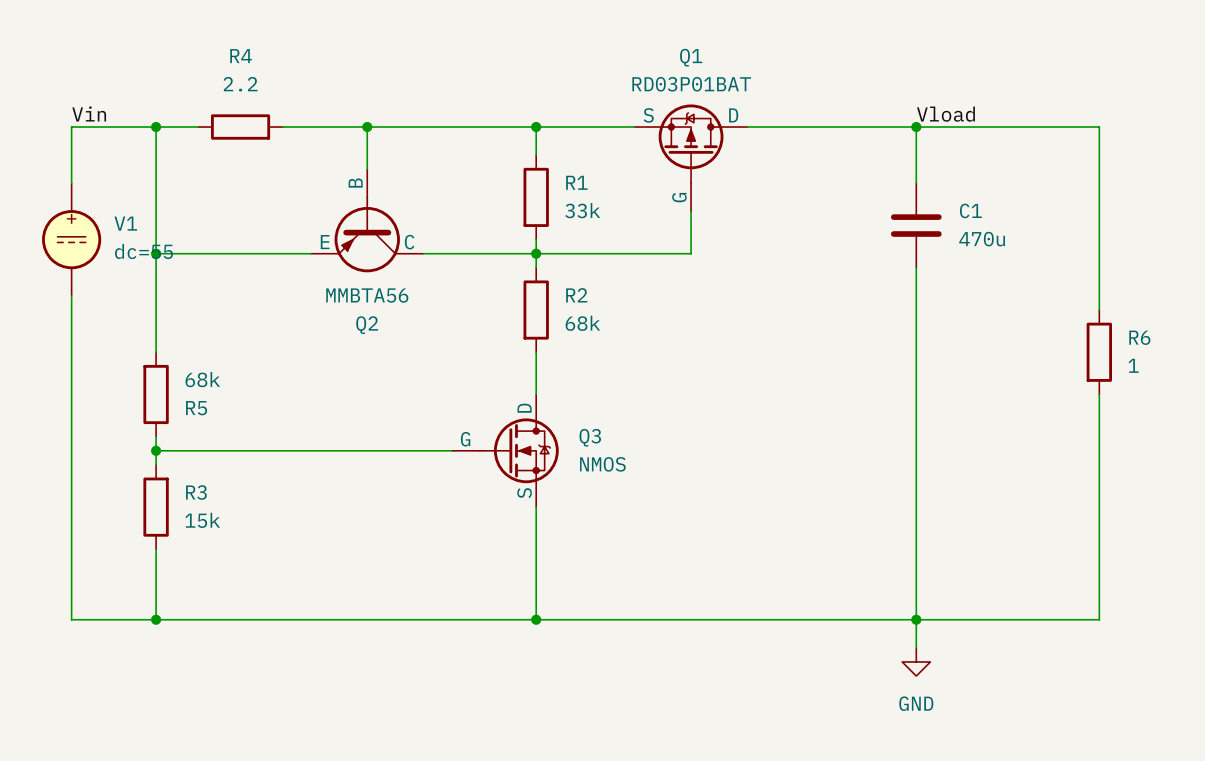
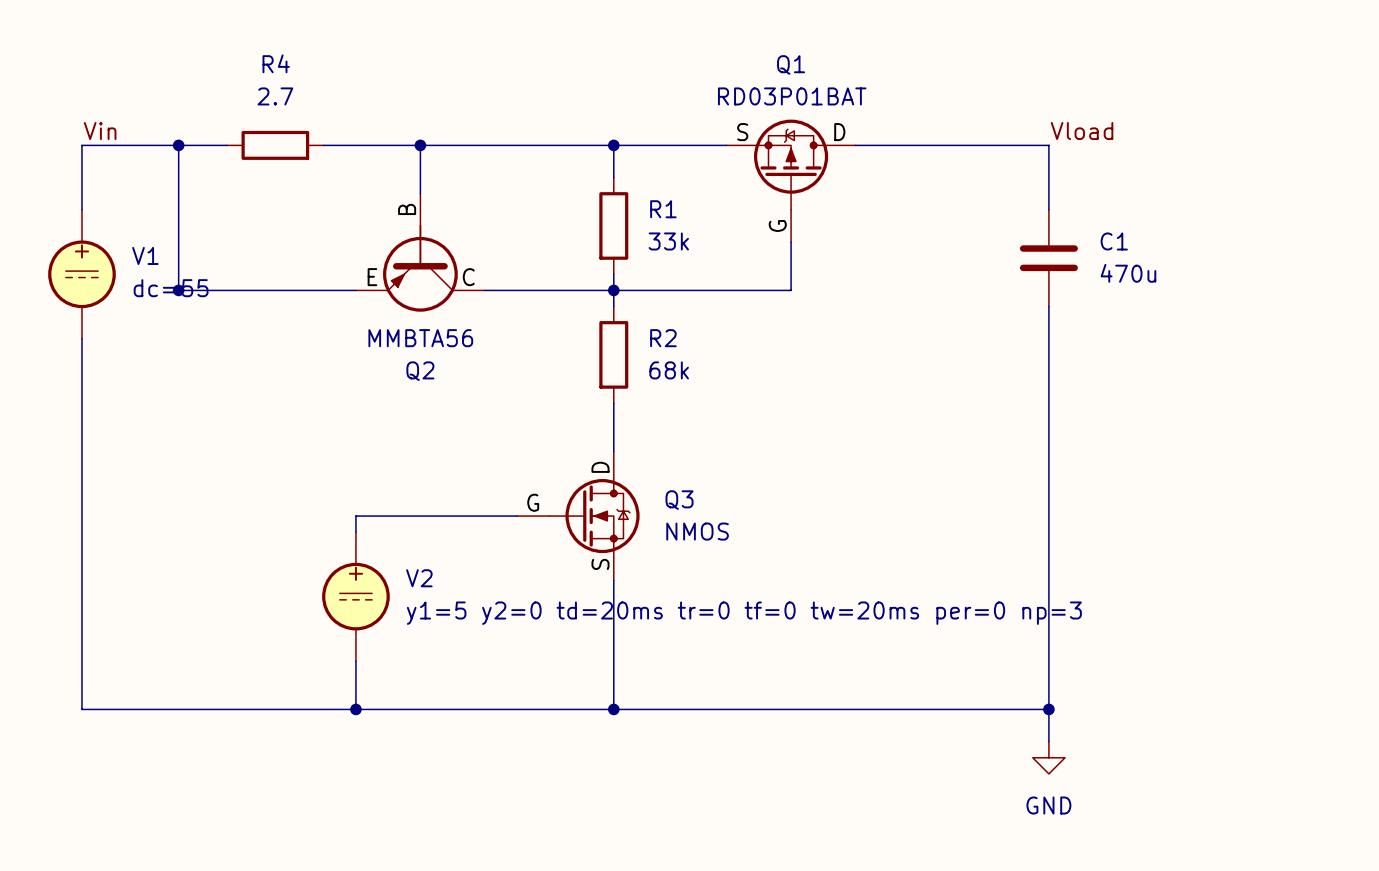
R4 value: 2.2 (240, 84) -> 2.7 (275, 96)
wire: (916, 127) (1099, 127) (1099, 310) -> none
junction: (916, 127) -> none
wire: (156, 253) (156, 352) -> none
R6: 1 (1099, 352) -> none
R5: 68k (156, 394) -> none
wire: (1099, 394) (1099, 619) (916, 619) -> none
wire: (156, 436) (156, 464) -> none
wire: (156, 450) (310, 450) -> (355, 532) (355, 516)
junction: (156, 450) -> none
R3: 15k (156, 507) -> none
V2: none -> y1=5 y2=0 td=20ms tr=0 tf=0 tw=20ms per=0 np=3 (355, 596)
wire: (156, 549) (156, 619) -> none
wire: none -> (355, 661) (355, 709)
junction: (156, 619) -> none
junction: none -> (355, 709)

